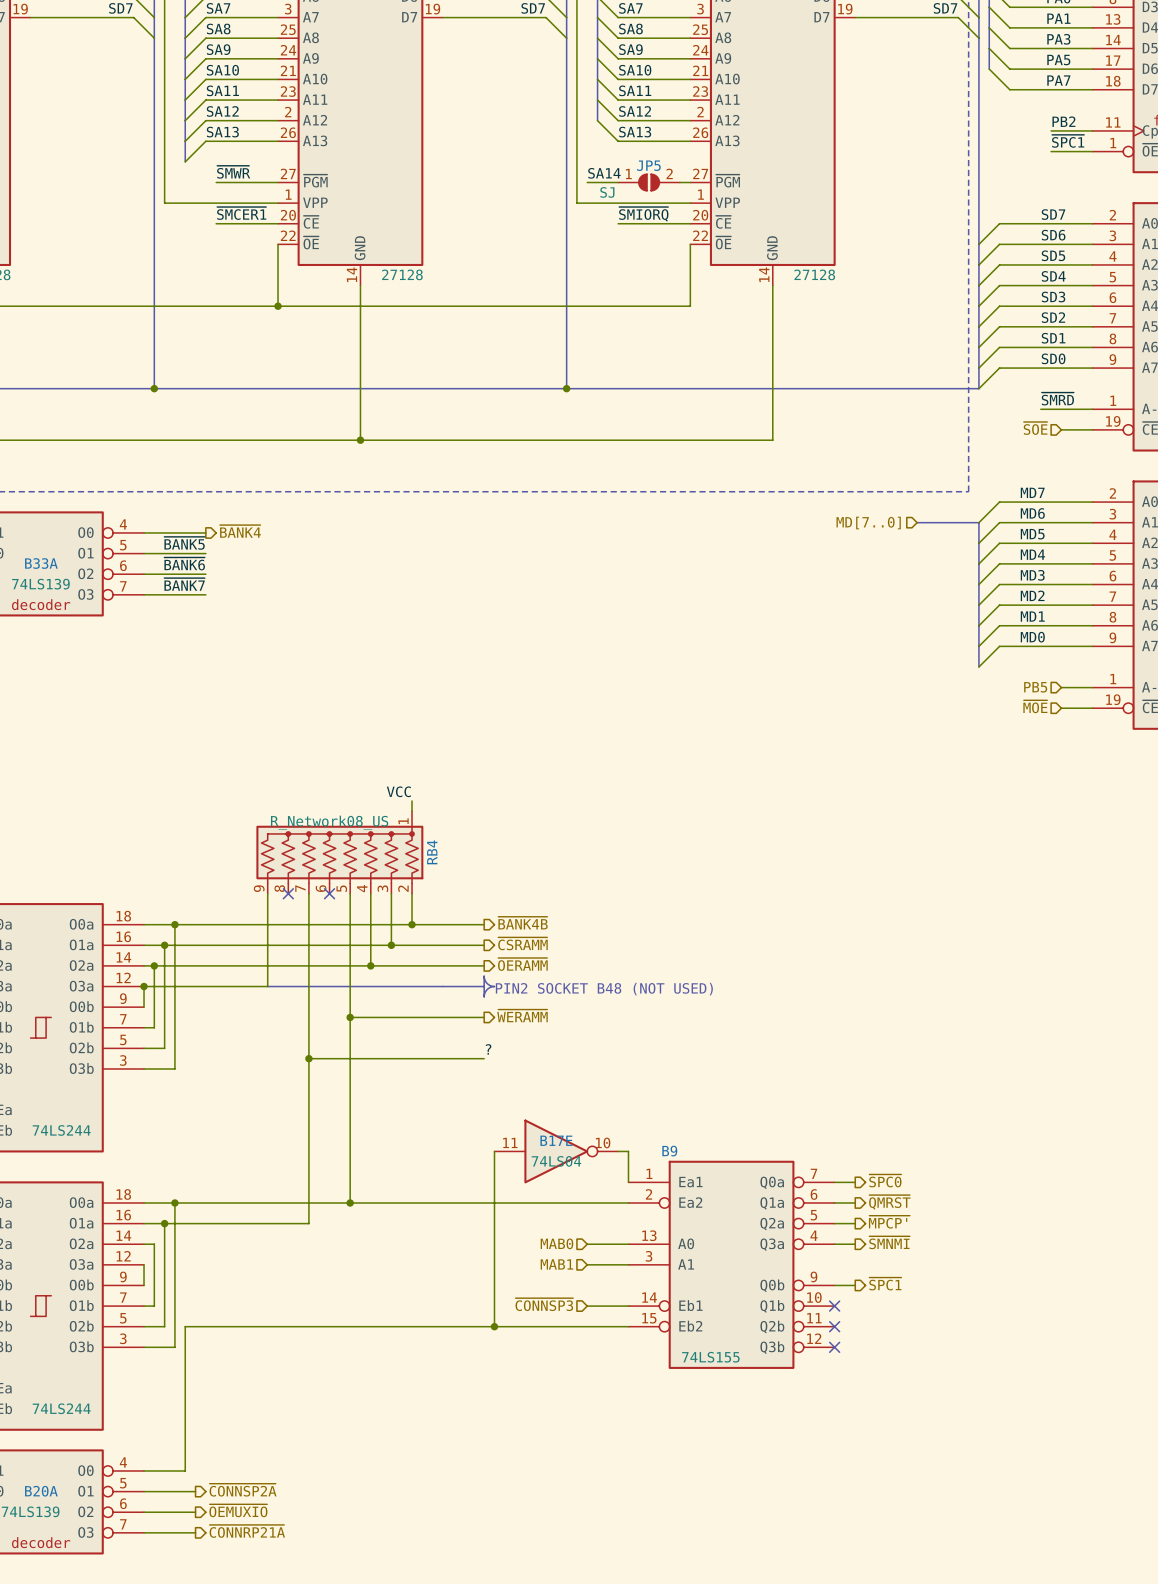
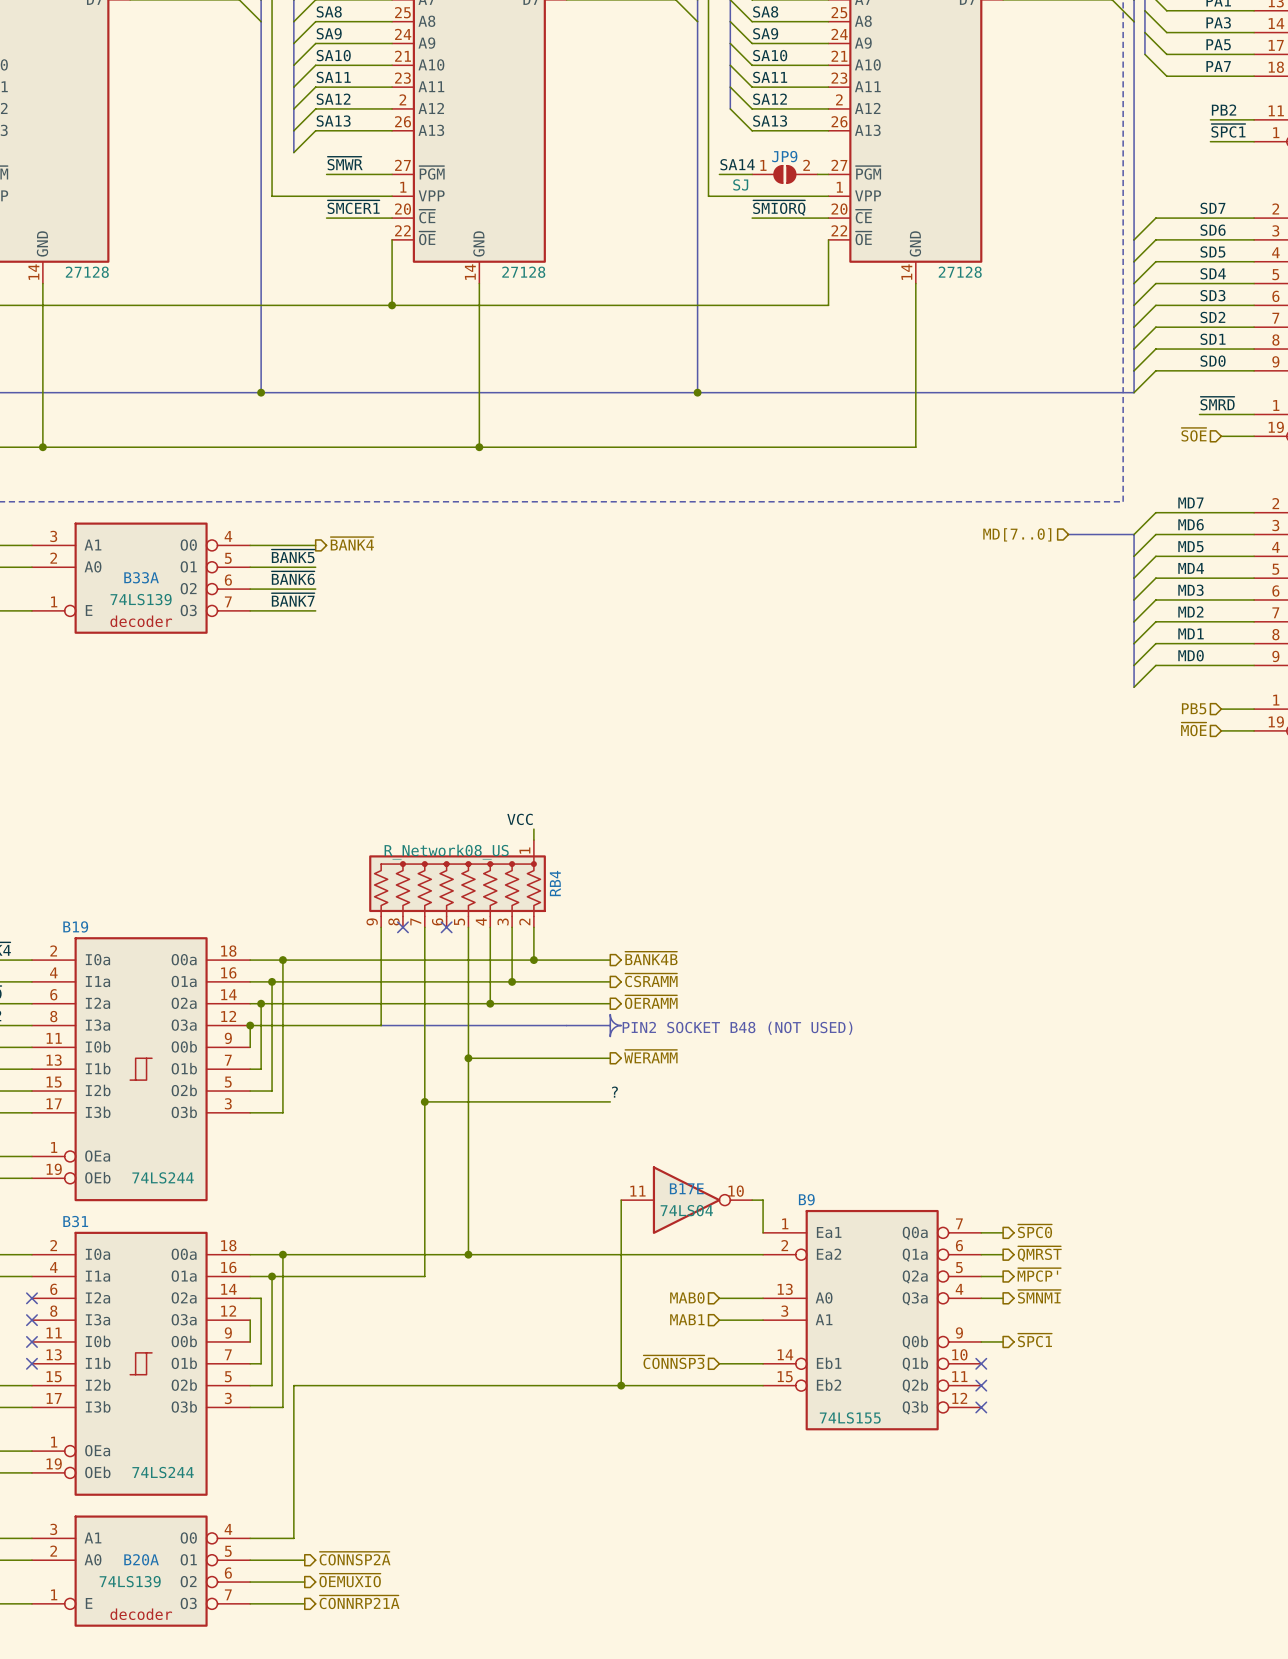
JP5 name: JP5 (648, 165) -> JP9 (784, 156)

